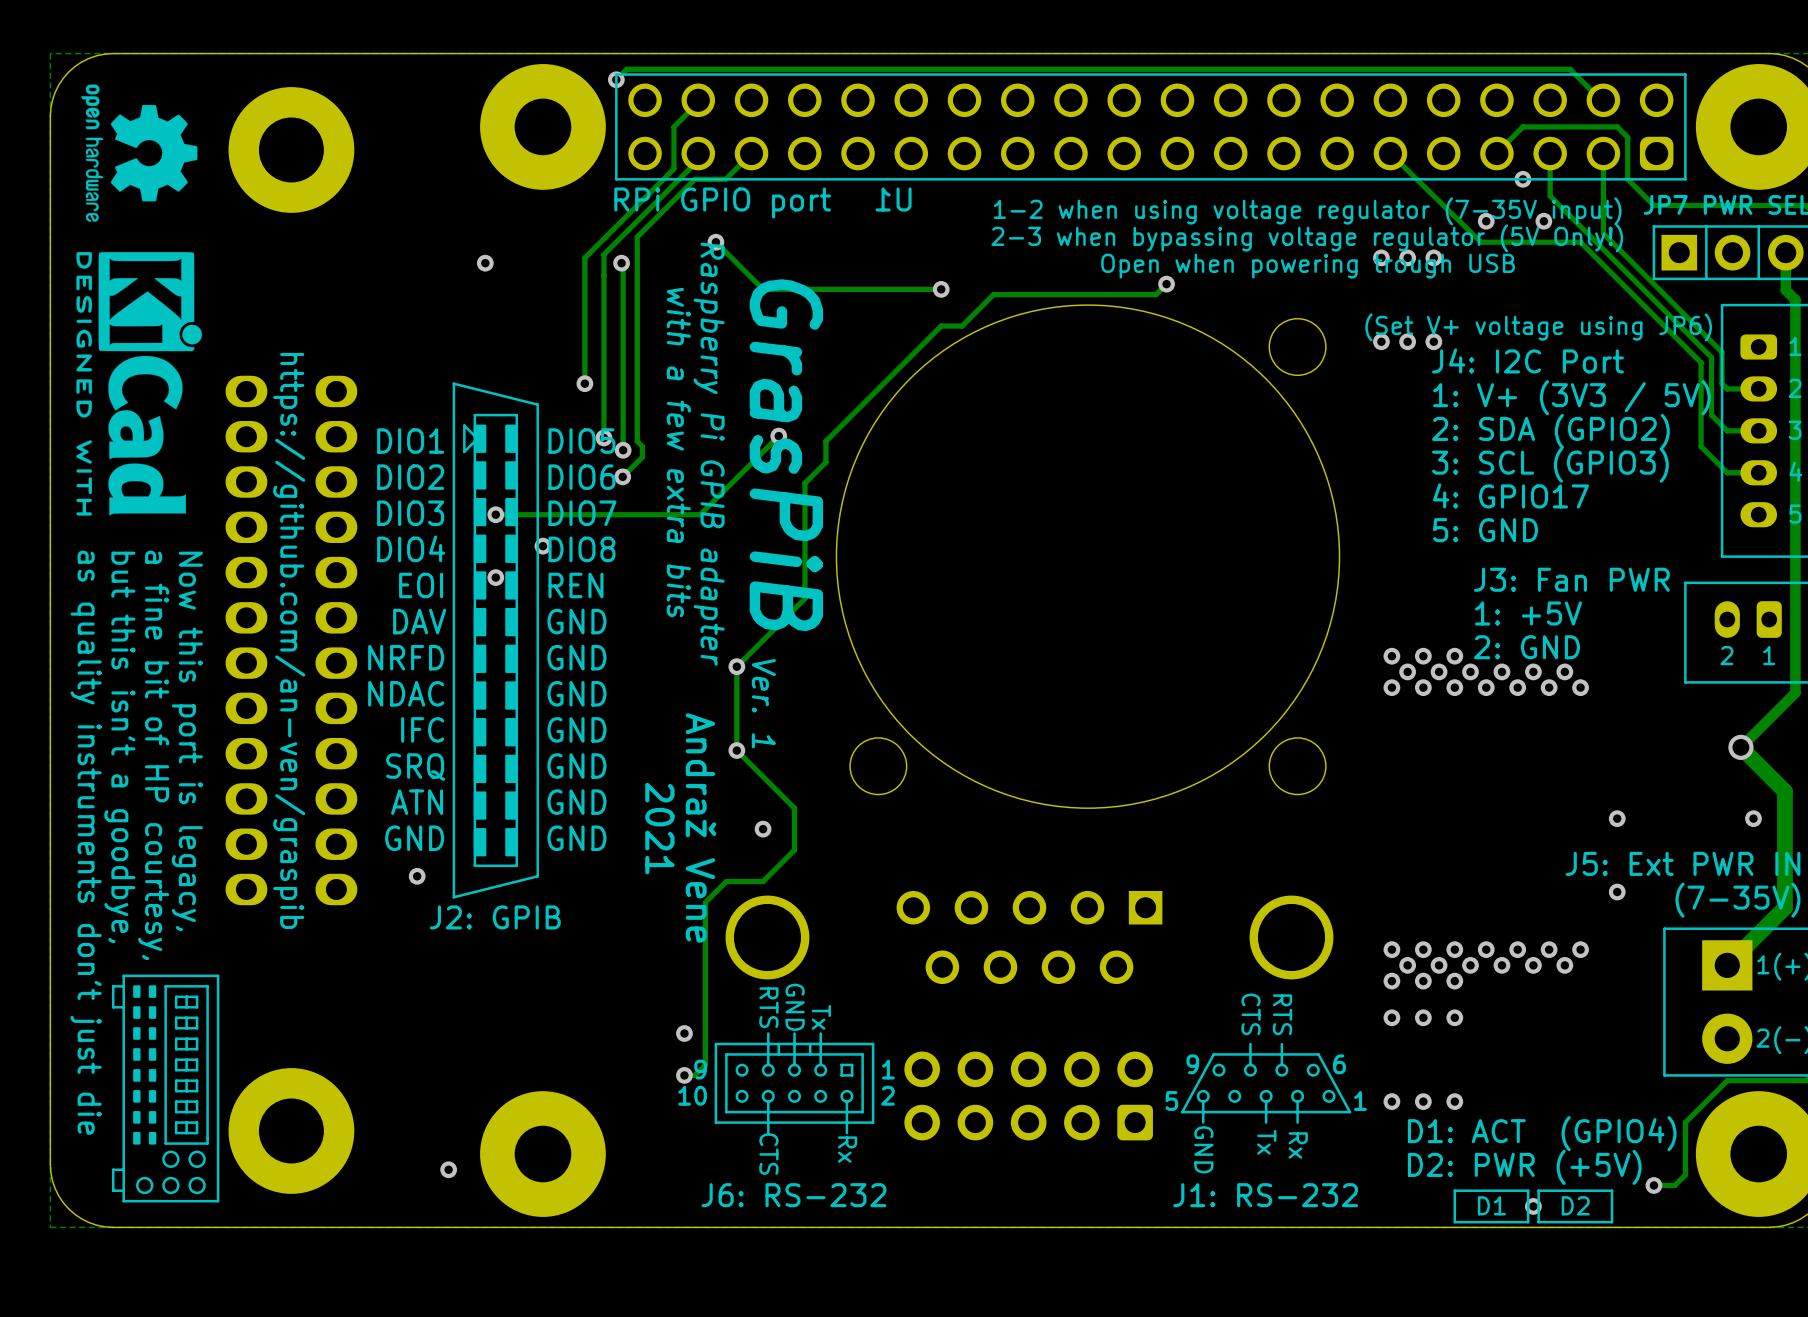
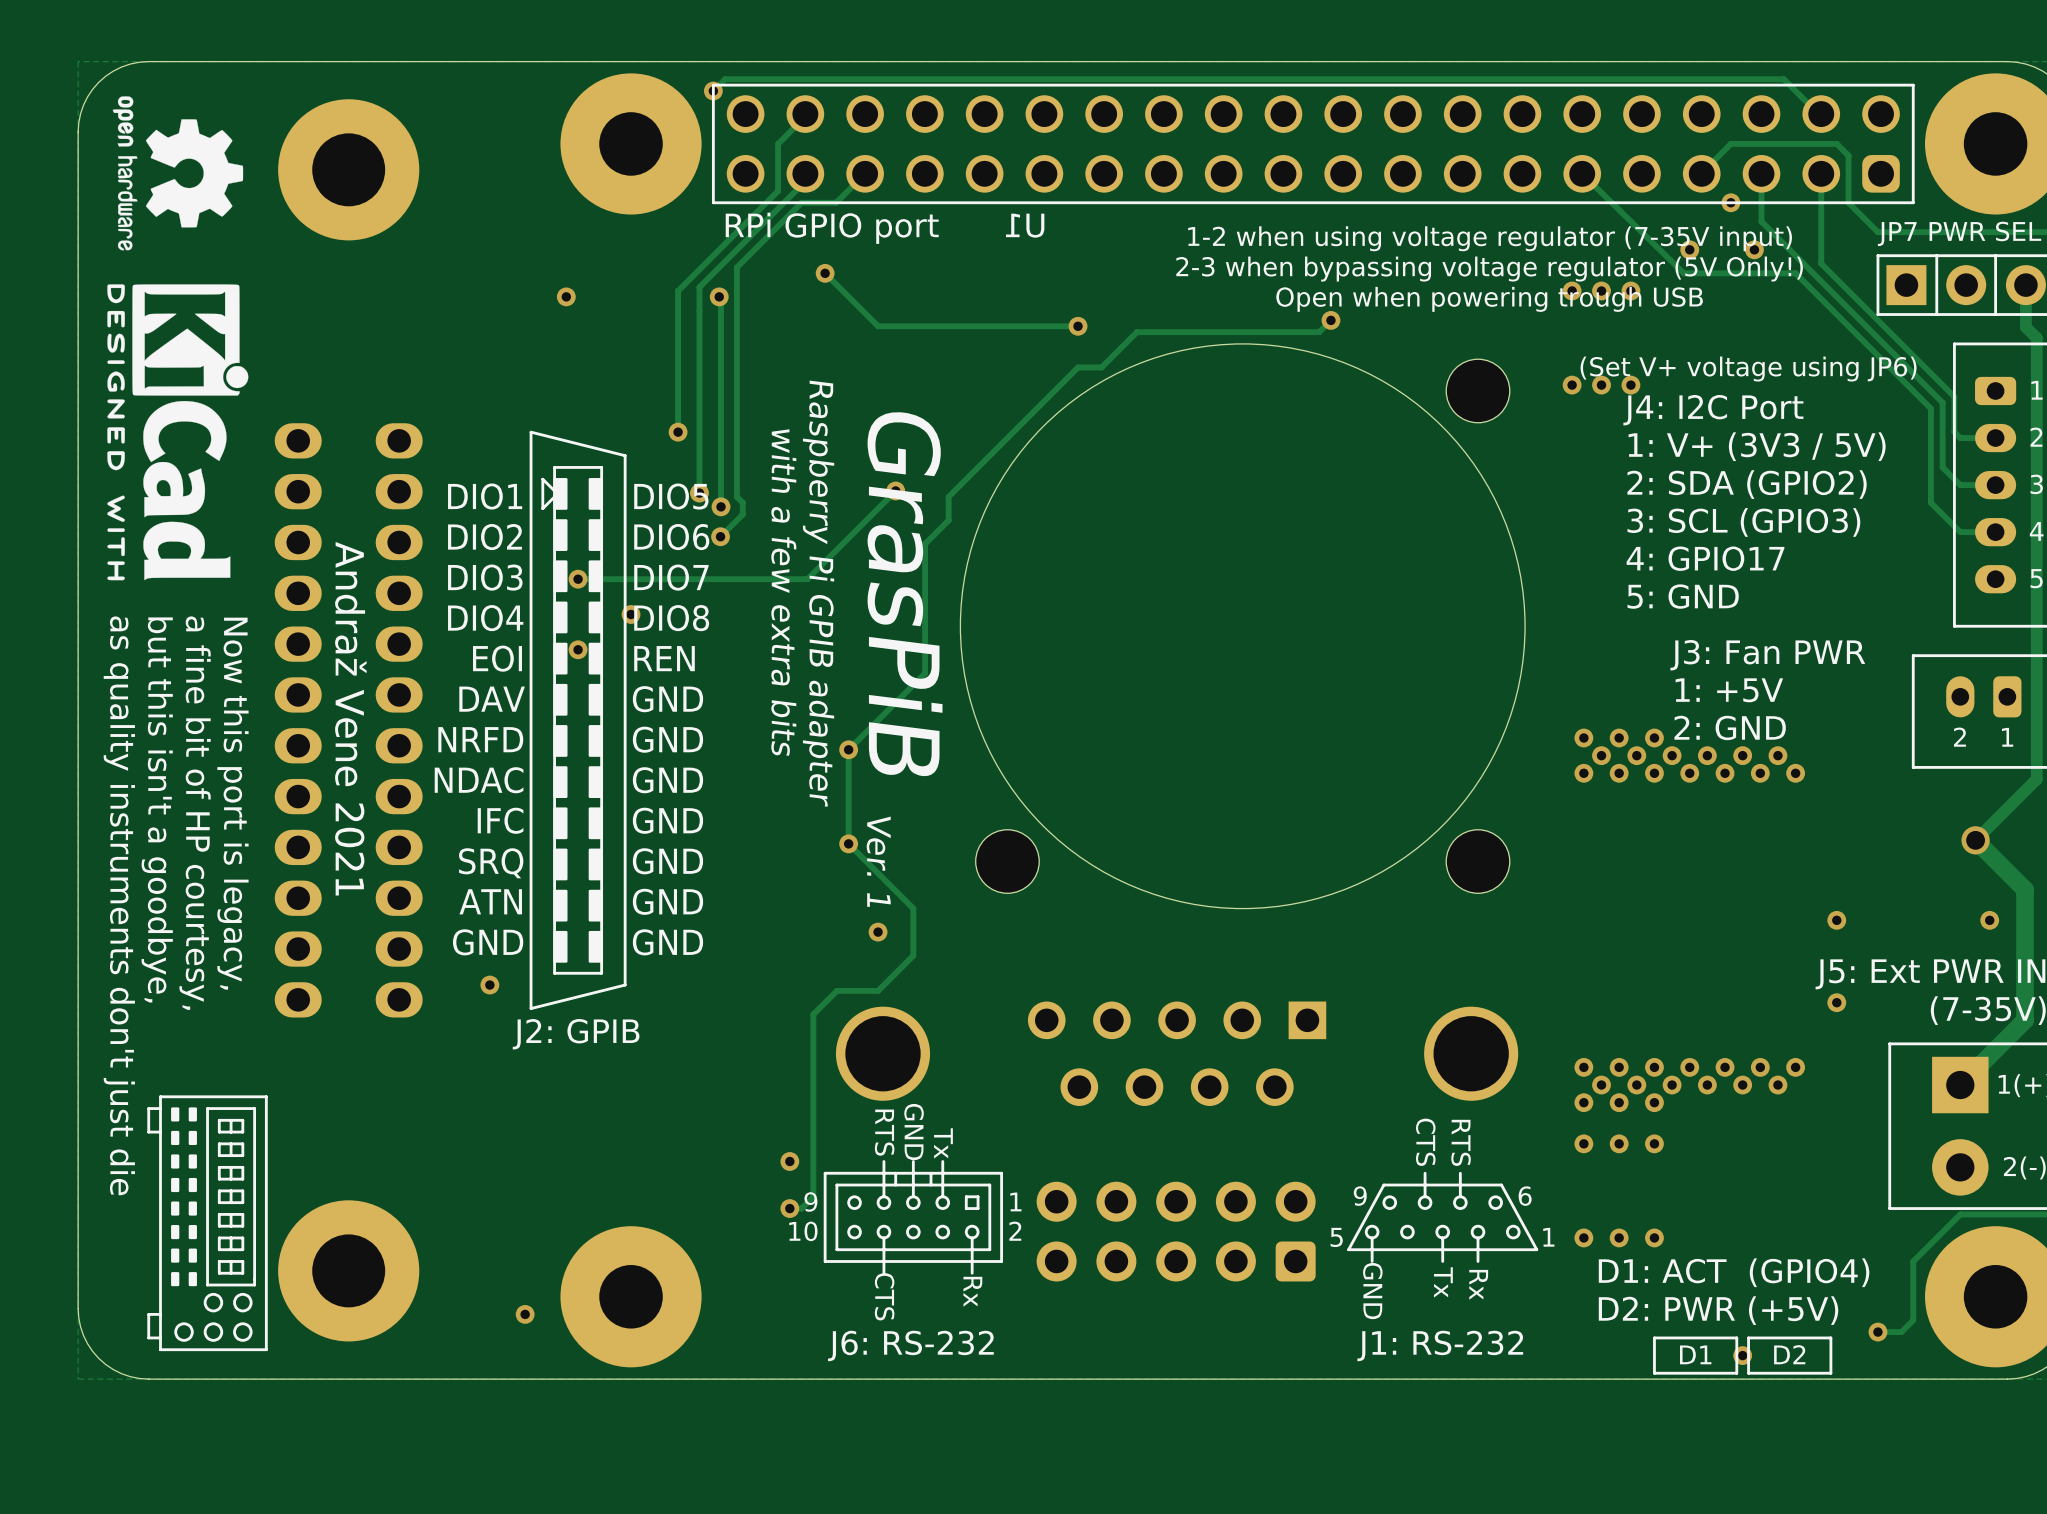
text position: with a few extra bits (678, 452) -> with a few extra bits (783, 592)
text position: Raspberry Pi GPIB adapter (709, 454) -> Raspberry Pi GPIB adapter (818, 593)
text position: GrasPiB (786, 455) -> GrasPiB (905, 593)
text: https://github.com/an-ven/graspib (289, 640) -> Andraž Vene 2021 (350, 718)
text position: Ver. 1 (763, 703) -> Ver. 1 (878, 861)
text: Andraž Vene (701, 827) -> none
text: 2021 (659, 828) -> none

